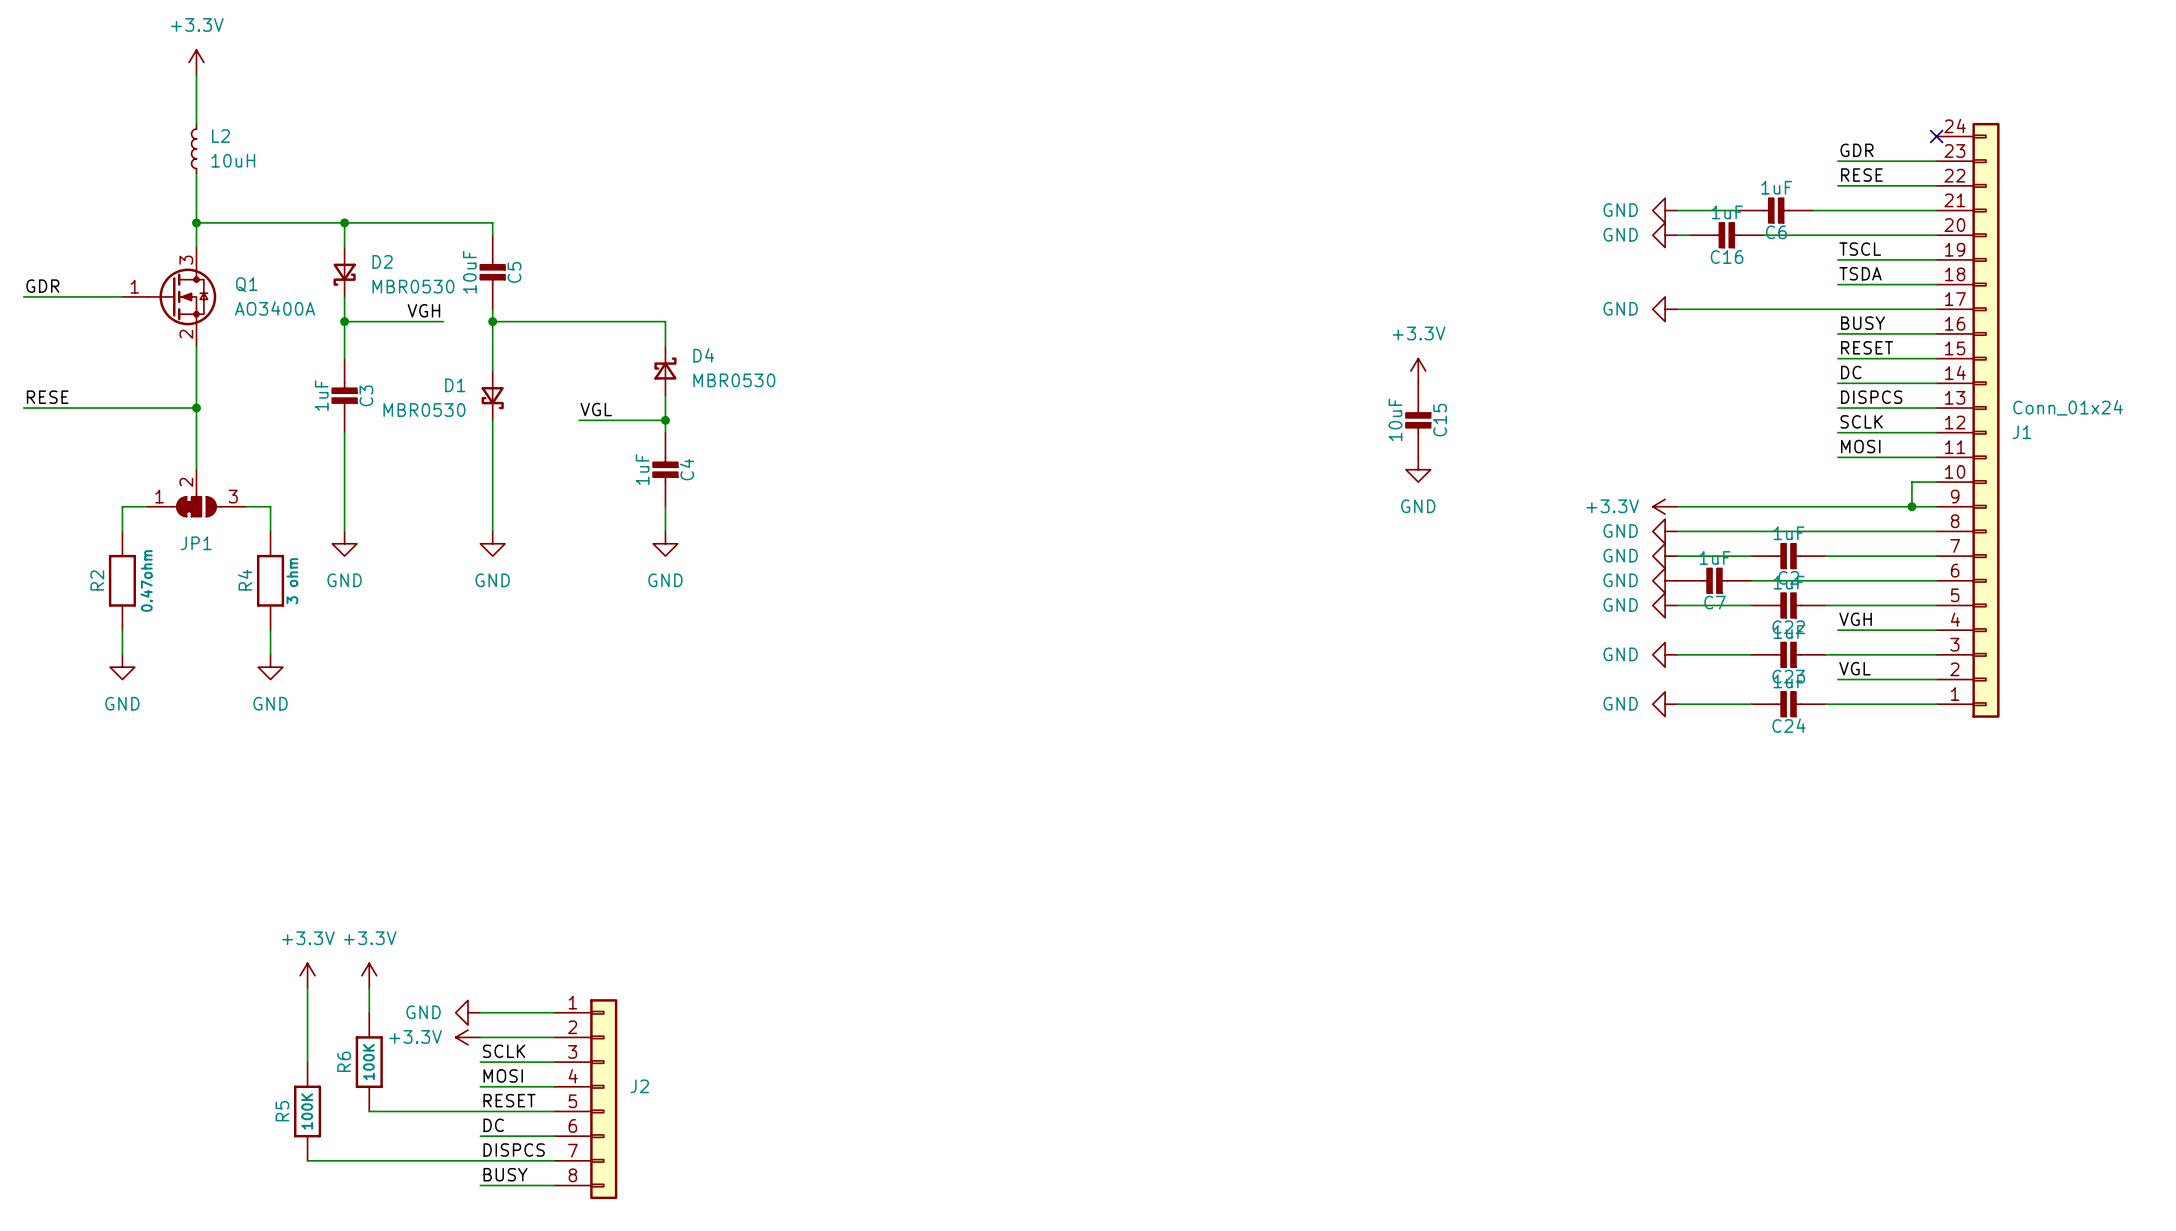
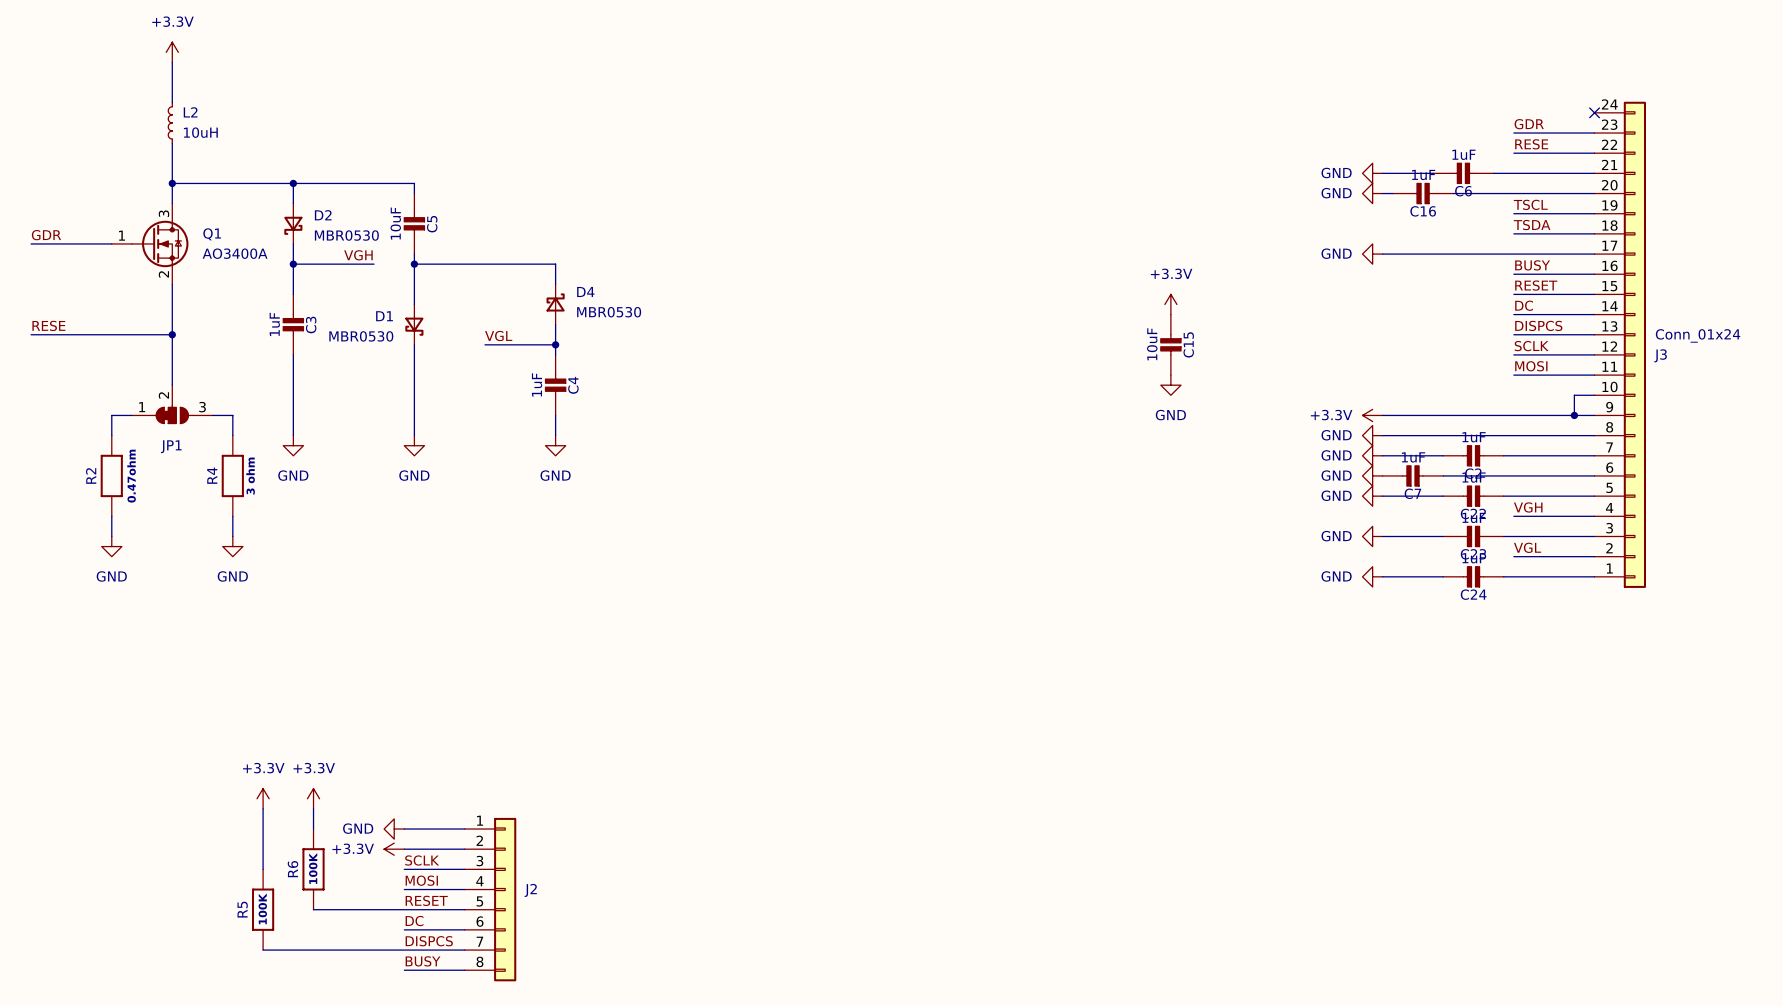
J1 name: J1 (2021, 432) -> J3 (1660, 355)

